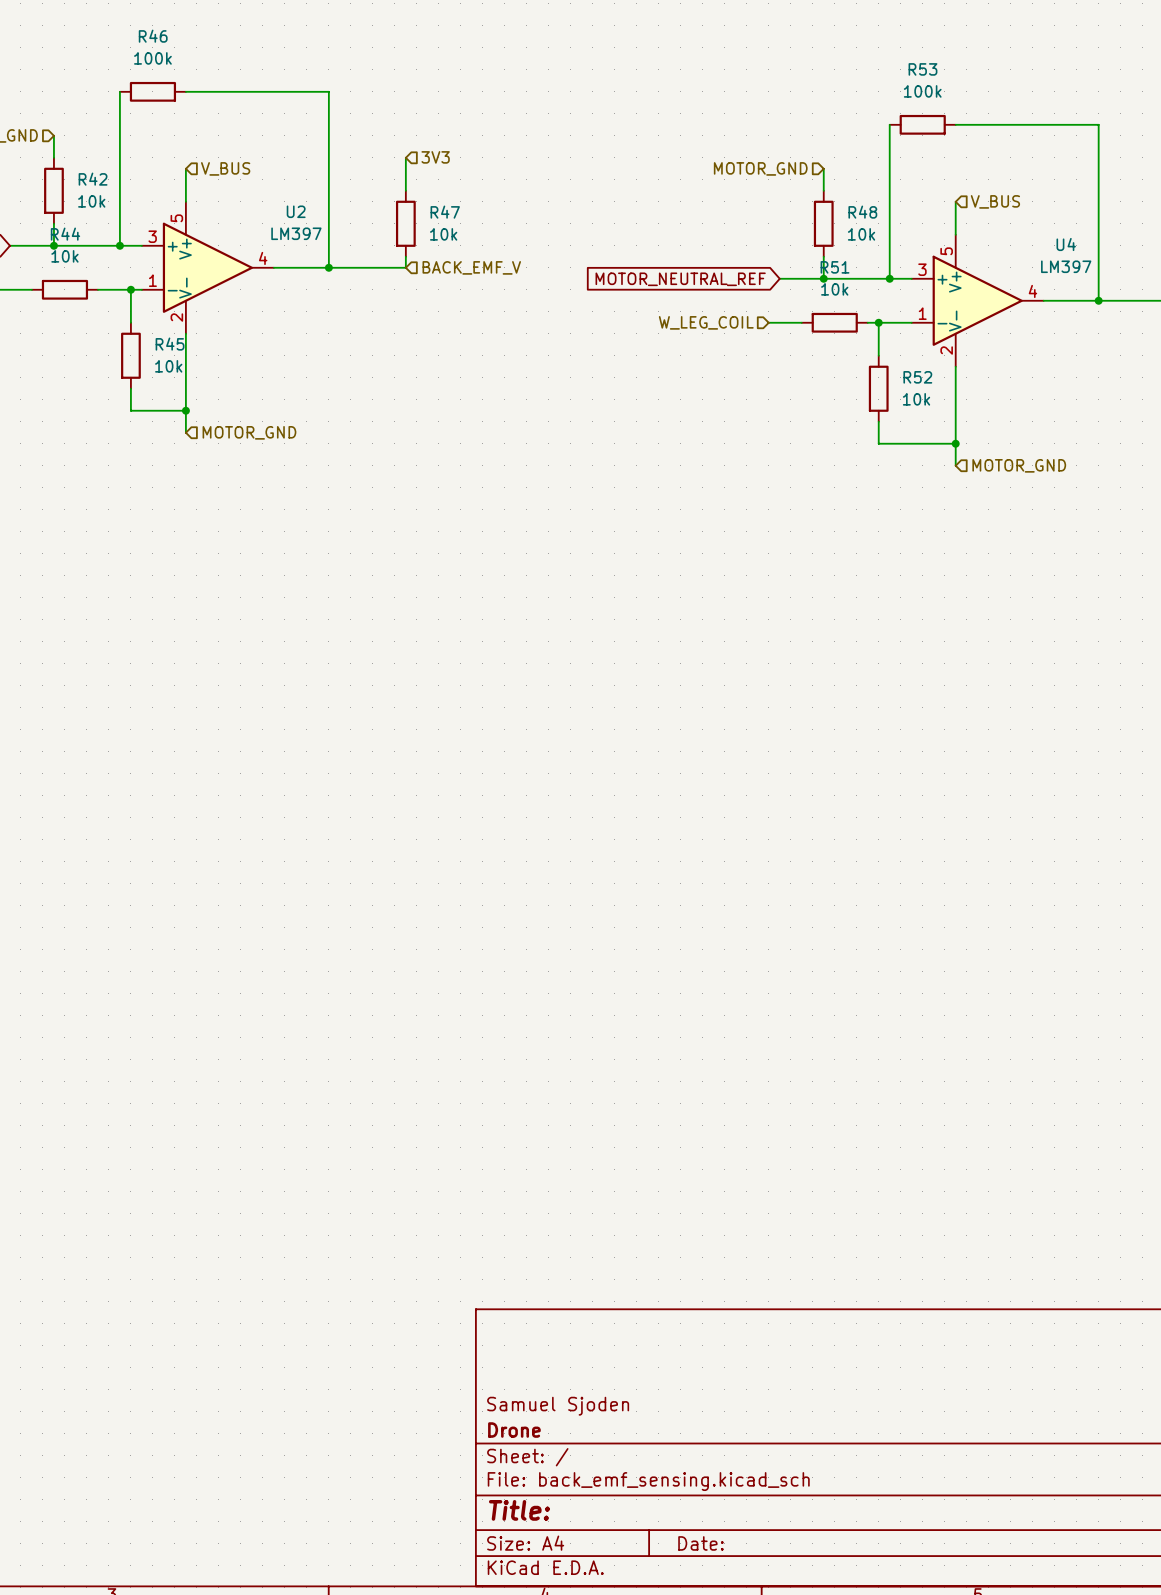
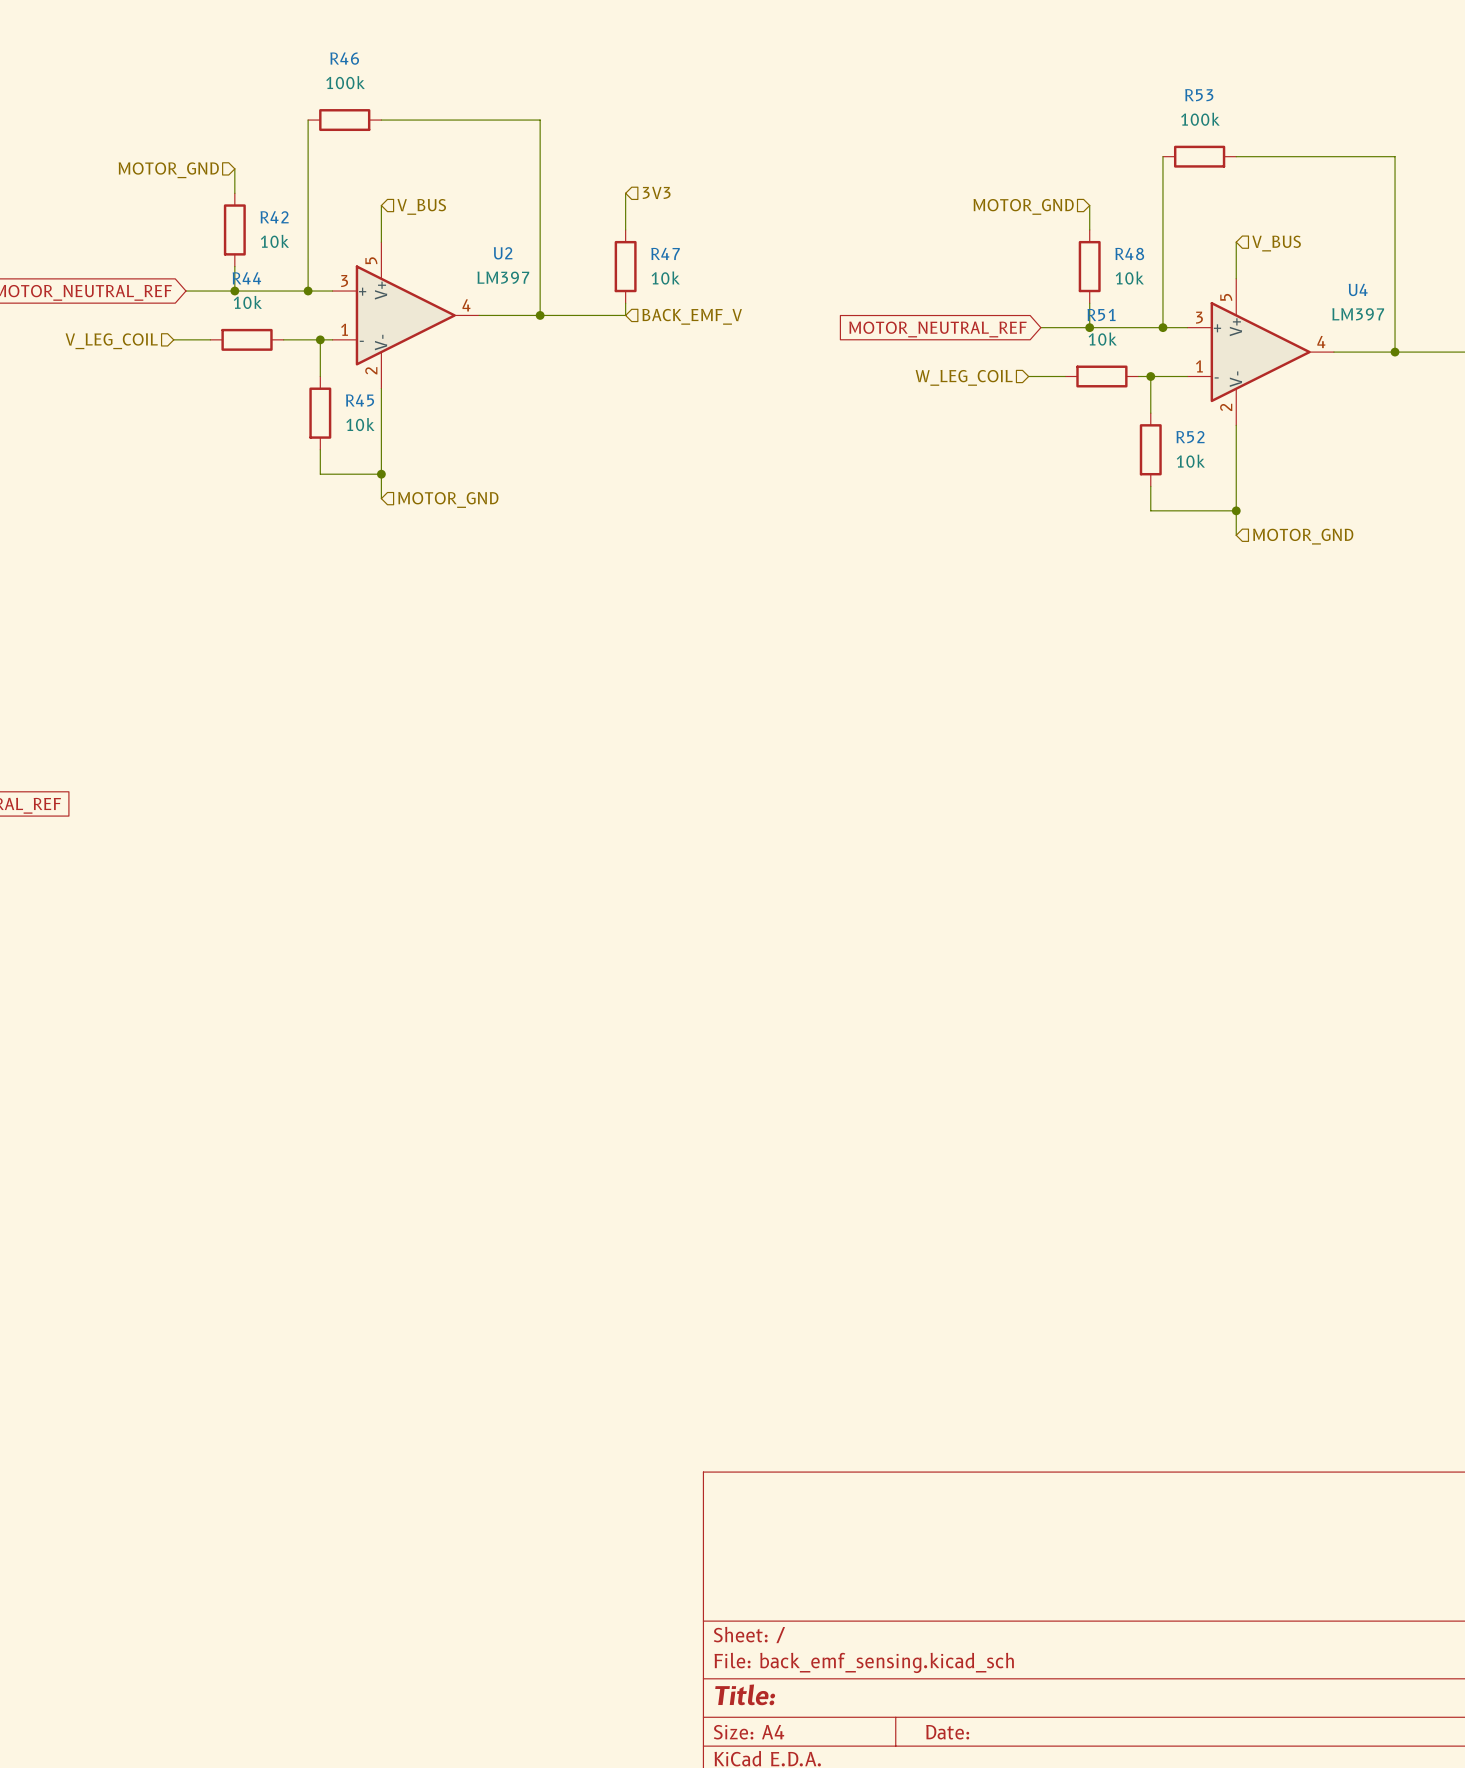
title block: Samuel Sjoden (558, 1406) -> none
title block: Drone (514, 1430) -> none

